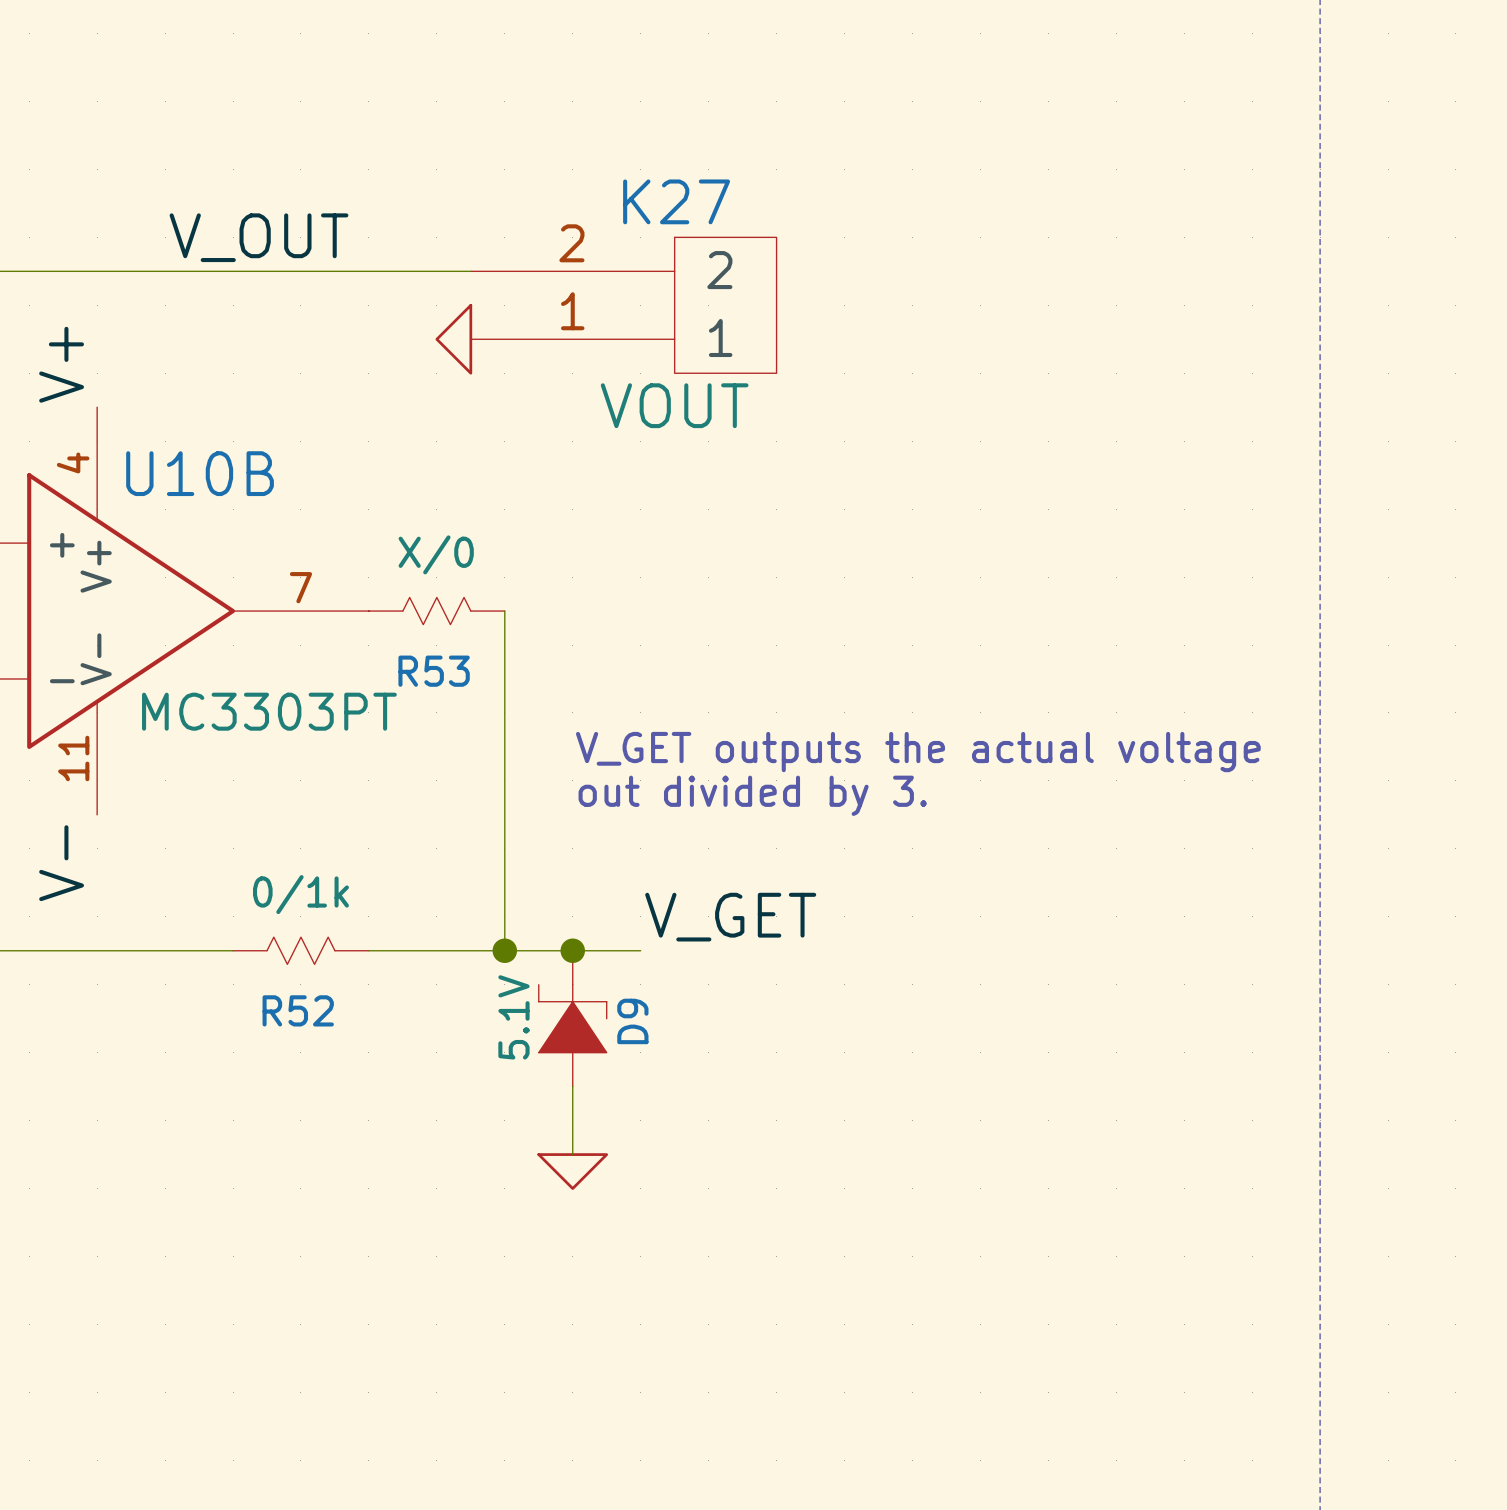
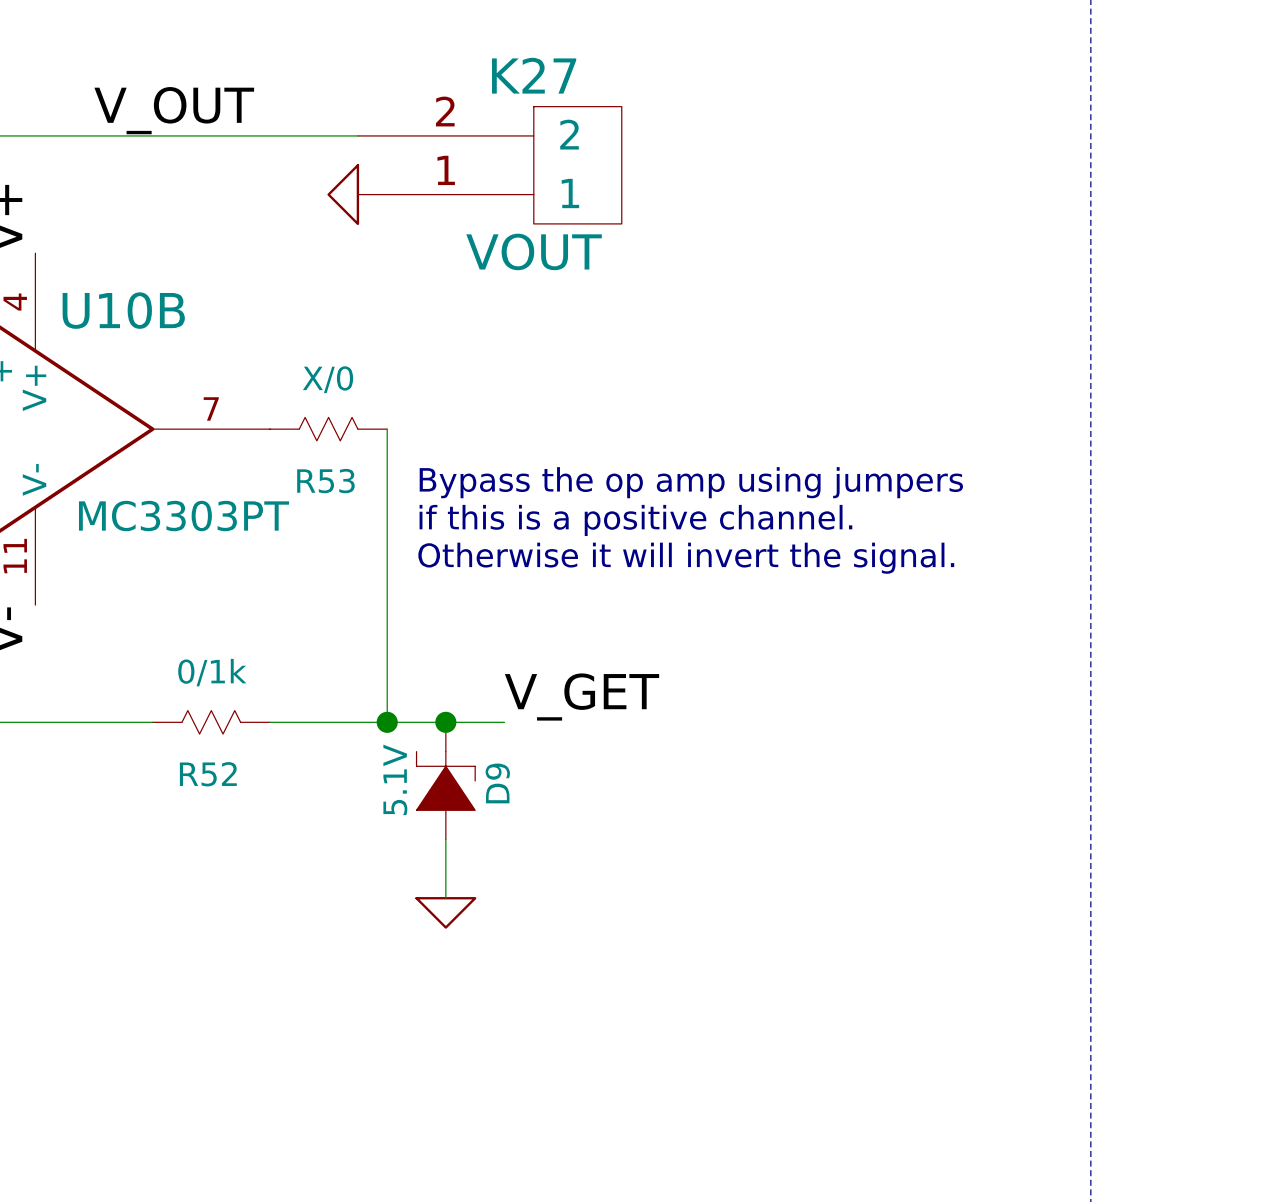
text: none -> Bypass the op amp using jumpers (691, 482)
text: none -> if this is a positive channel. (635, 520)
text: V_GET outputs the actual voltage (918, 752) -> none
text: none -> Otherwise it will invert the signal. (686, 558)
text: out divided by 3. (752, 795) -> none

